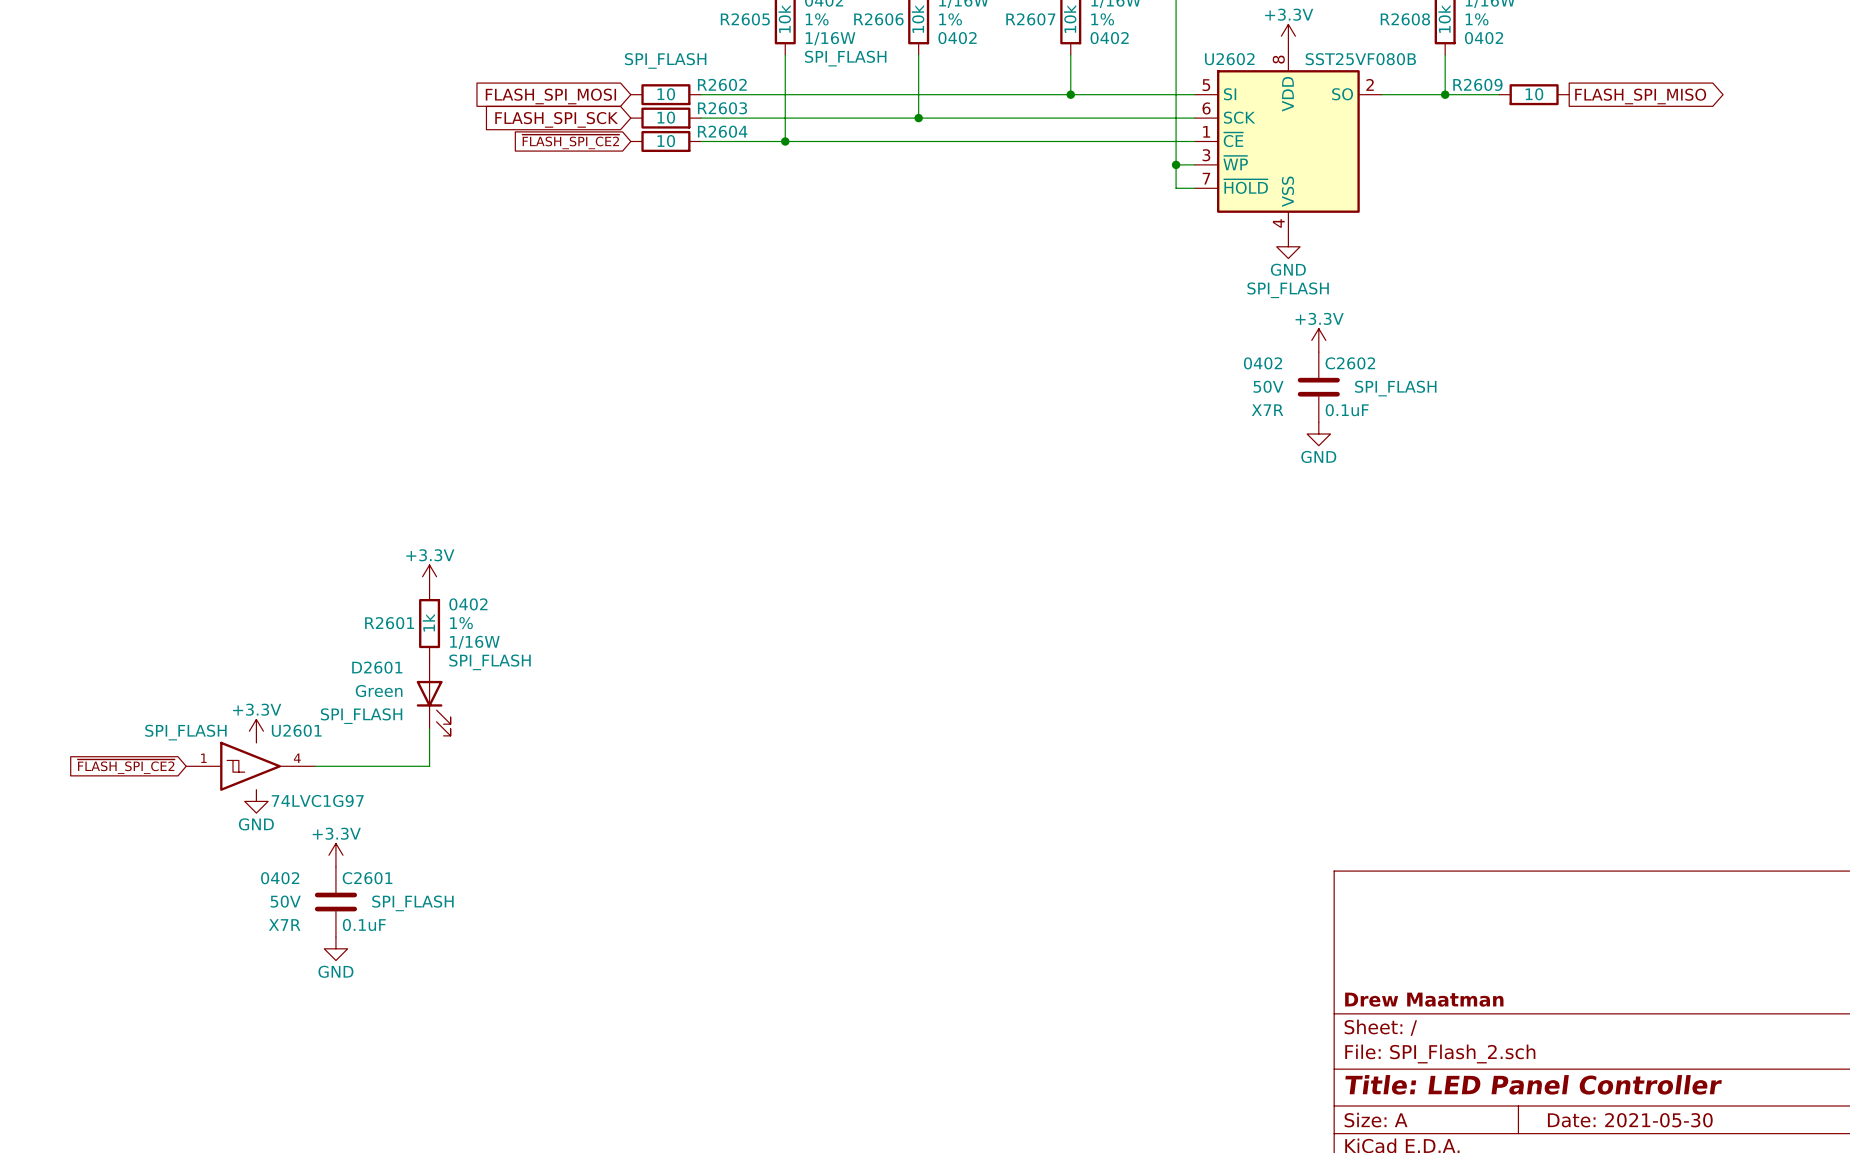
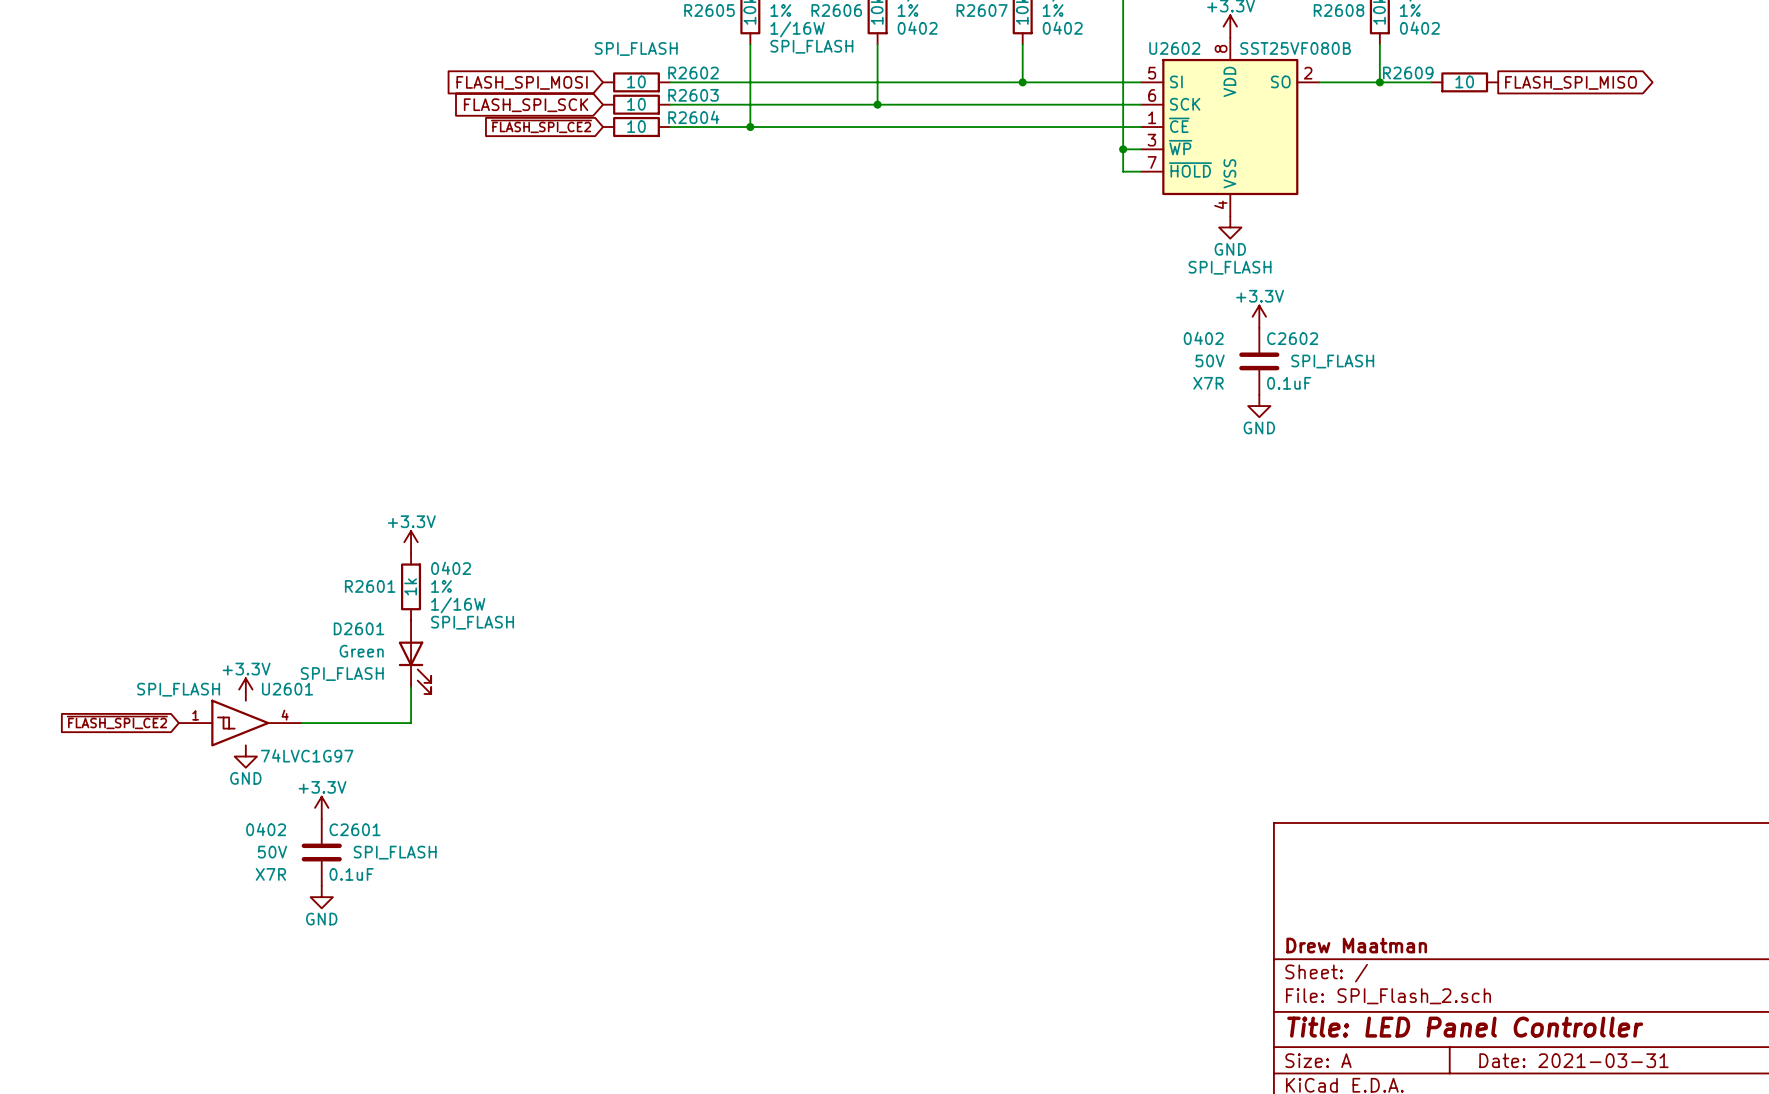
title block: Date: 2021-05-30 (1630, 1120) -> Date: 2021-03-31 (1573, 1060)

